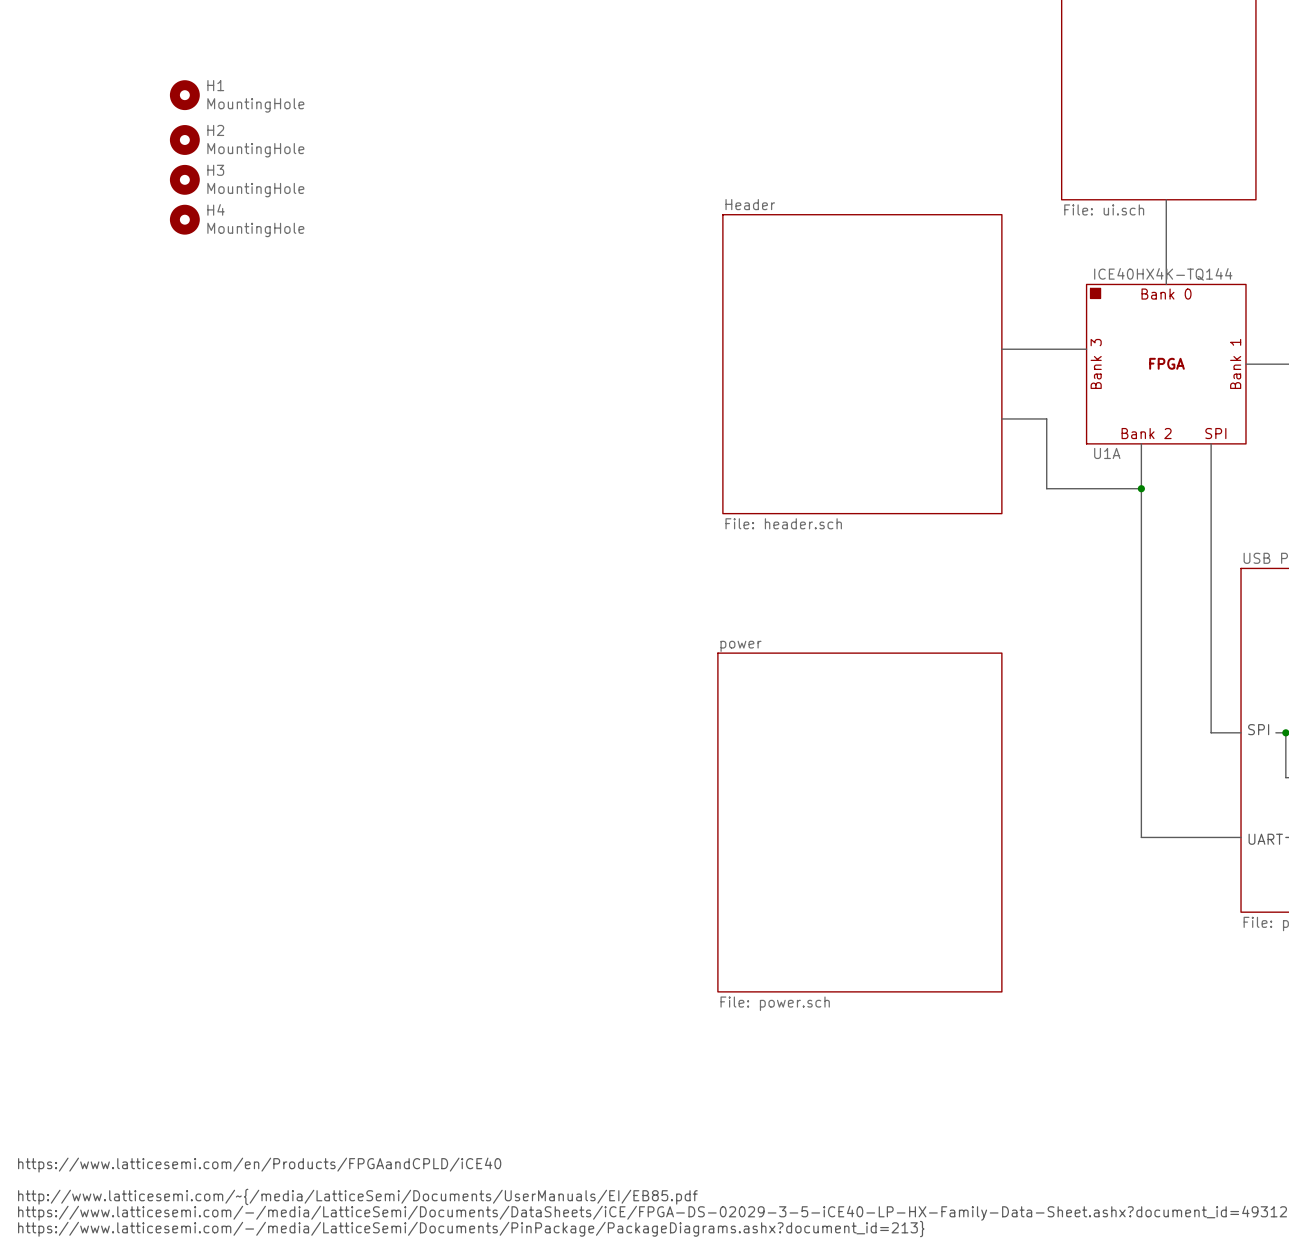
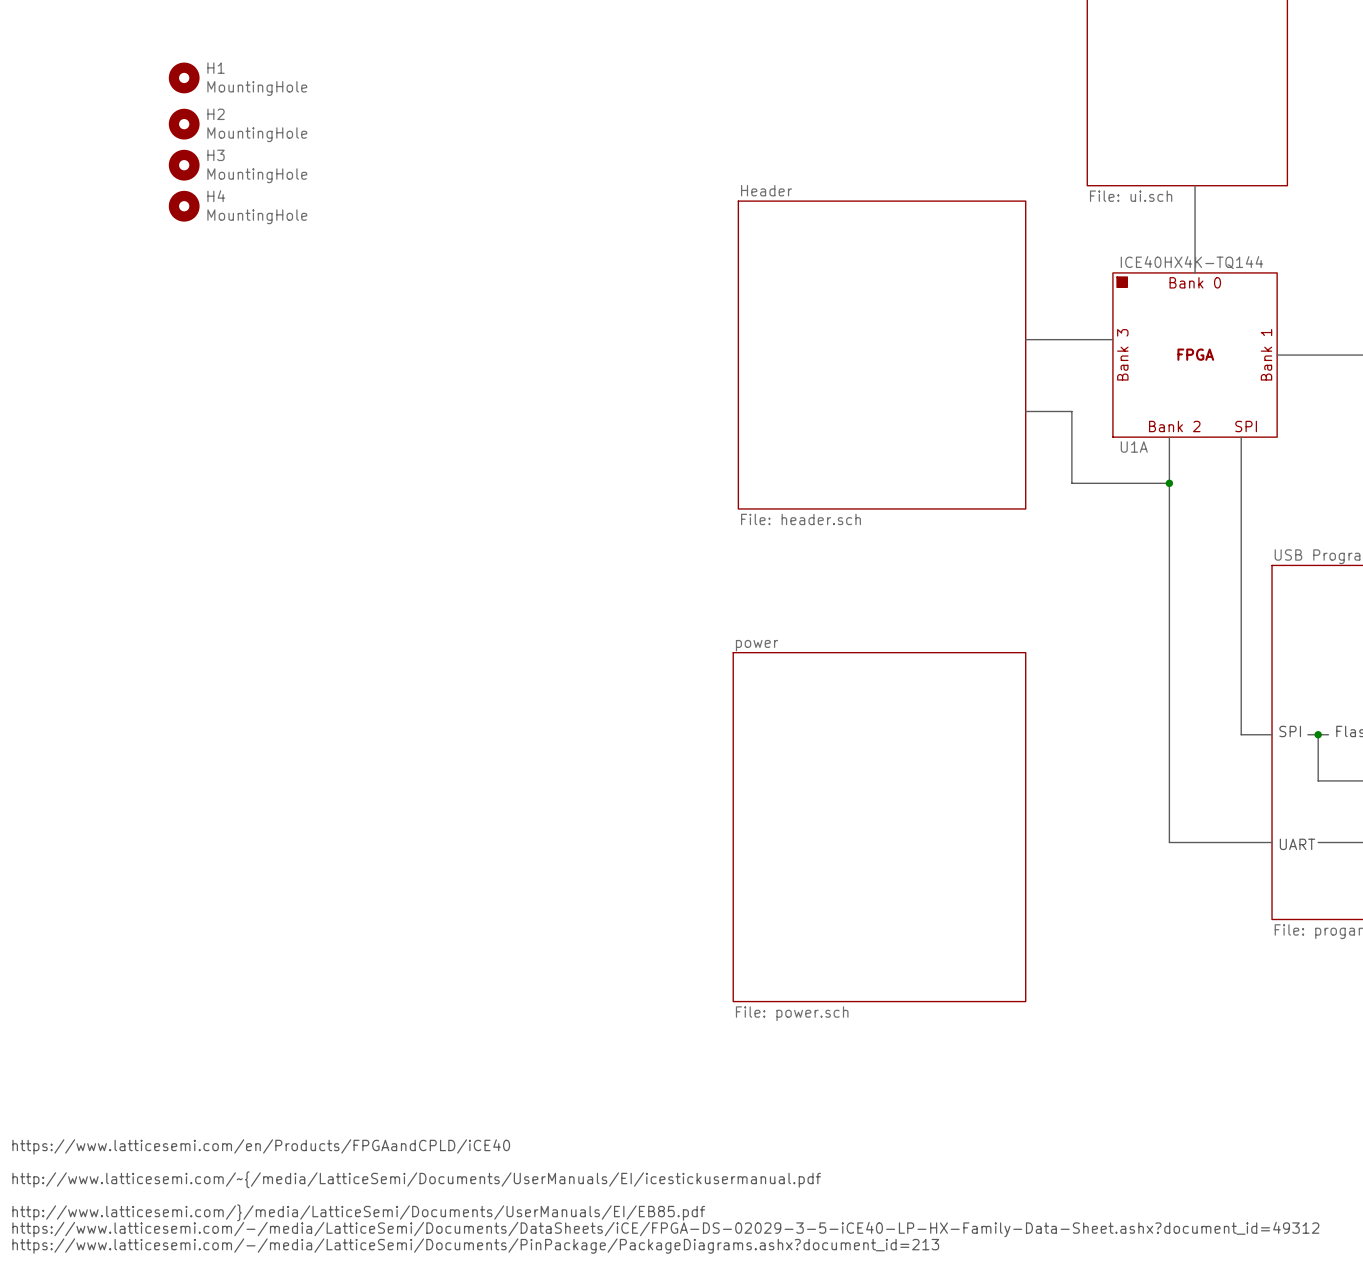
text: none -> https://www.latticesemi.com/en/Products/FPGAandCPLD/iCE40 (261, 1146)
text: https://www.latticesemi.com/en/Products/FPGAandCPLD/iCE40 (259, 1165) -> http://www.latticesemi.com/~{/media/LatticeSemi/Documents/UserManuals/EI/icestickusermanual.pdf (416, 1179)
text: http://www.latticesemi.com/~{/media/LatticeSemi/Documents/UserManuals/EI/EB85.pdf (357, 1196) -> http://www.latticesemi.com/}/media/LatticeSemi/Documents/UserManuals/EI/EB85.pdf (358, 1212)
text: https://www.latticesemi.com/-/media/LatticeSemi/Documents/PinPackage/PackageDiagrams.ashx?document_id=213} (471, 1229) -> https://www.latticesemi.com/-/media/LatticeSemi/Documents/PinPackage/PackageDiagrams.ashx?document_id=213 (475, 1246)

